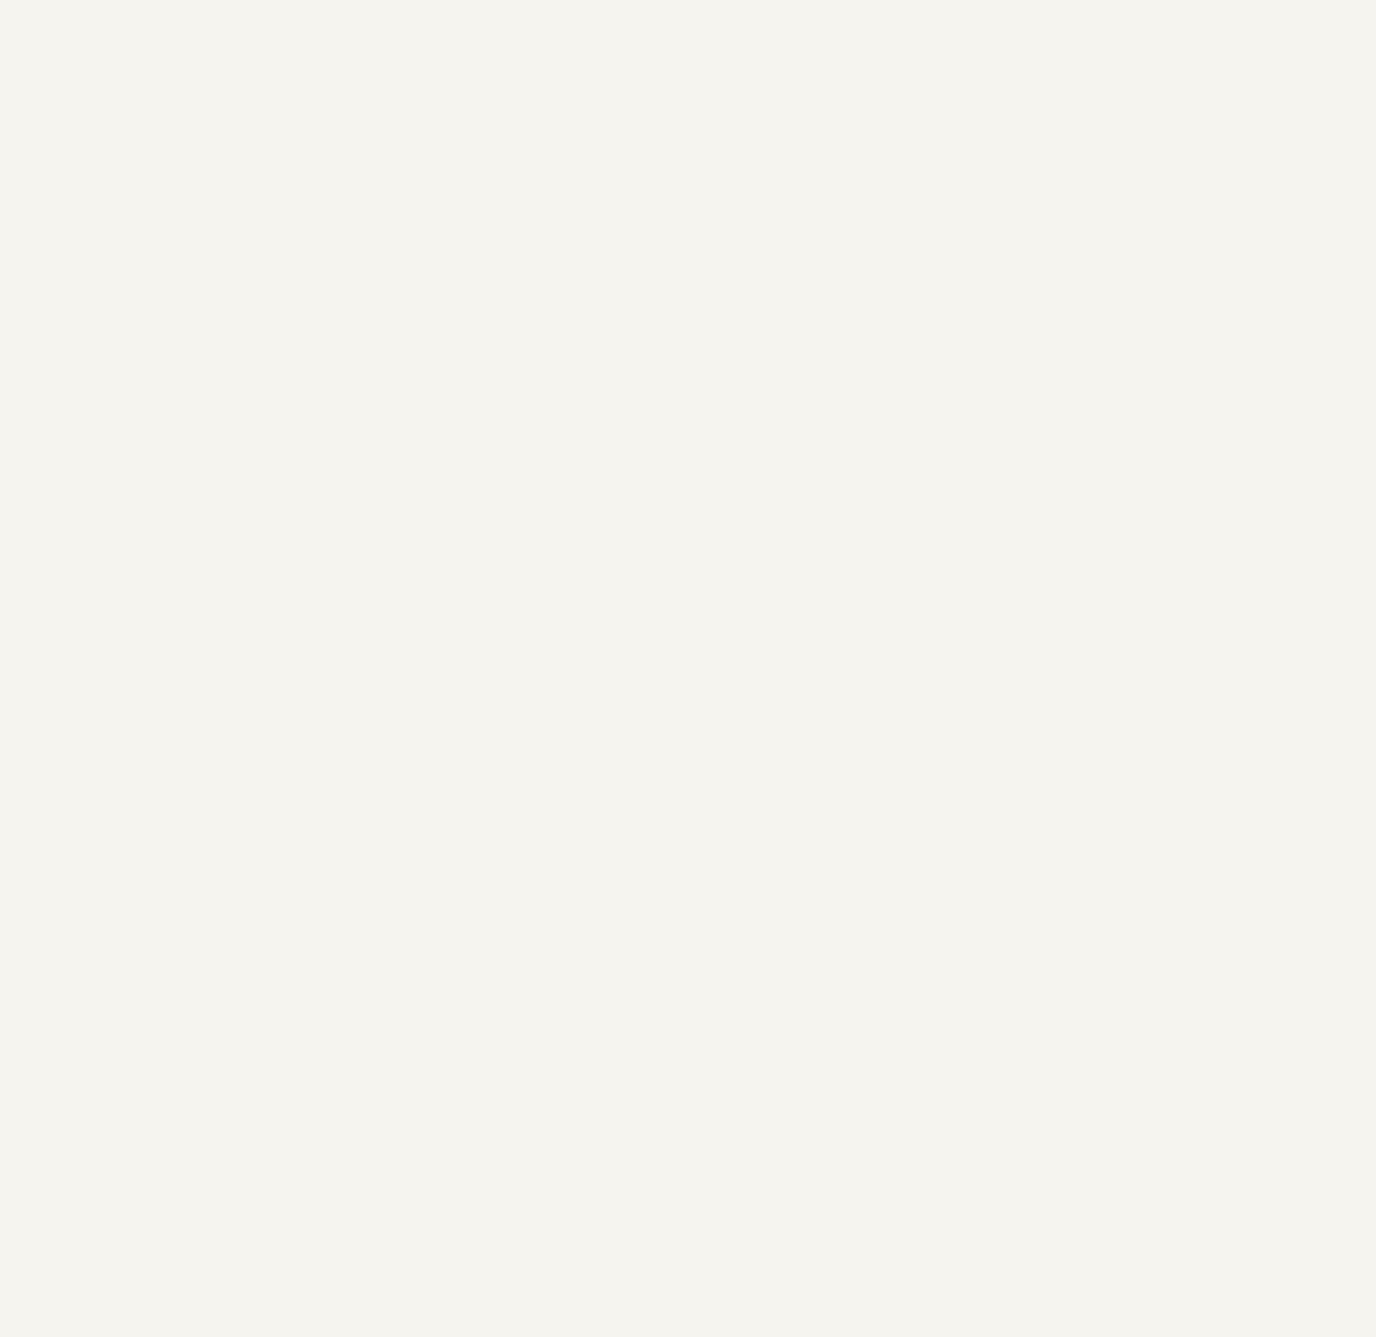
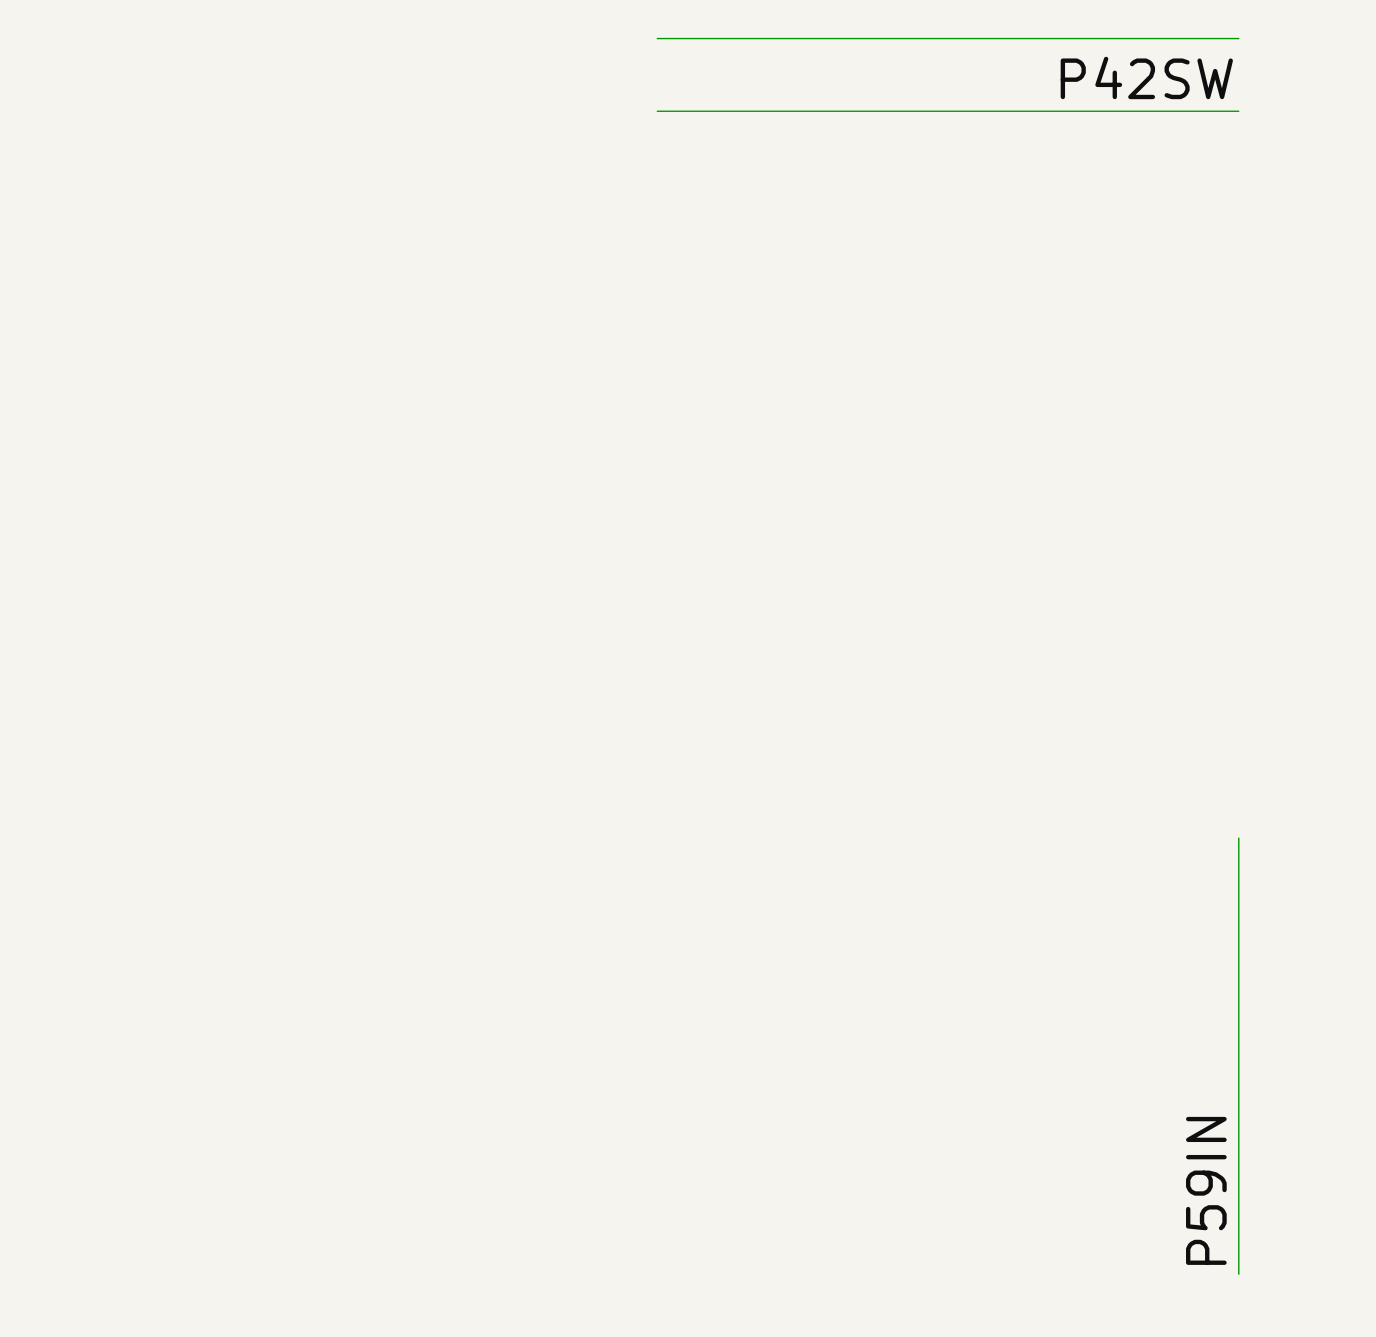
wire: none -> (657, 38) (1238, 38)
label: none -> P42SW (1146, 77)
wire: none -> (657, 111) (1238, 111)
wire: none -> (1238, 838) (1238, 1274)
label: none -> P59IN (1206, 1190)

